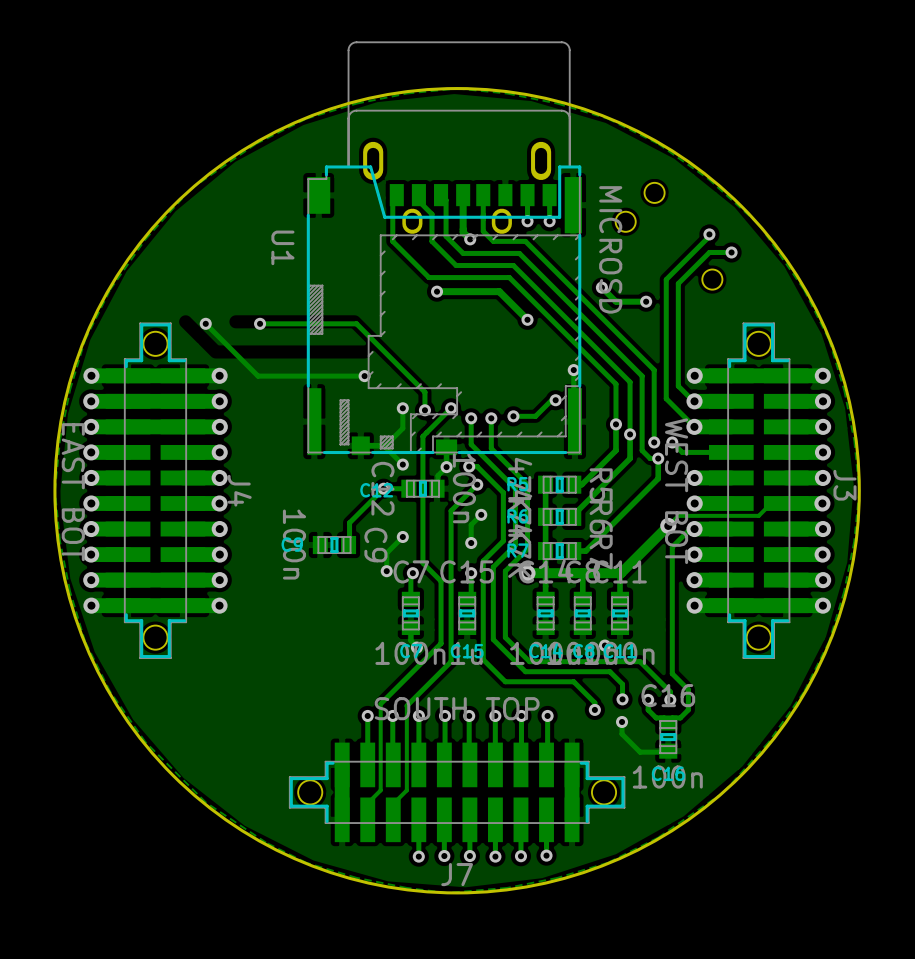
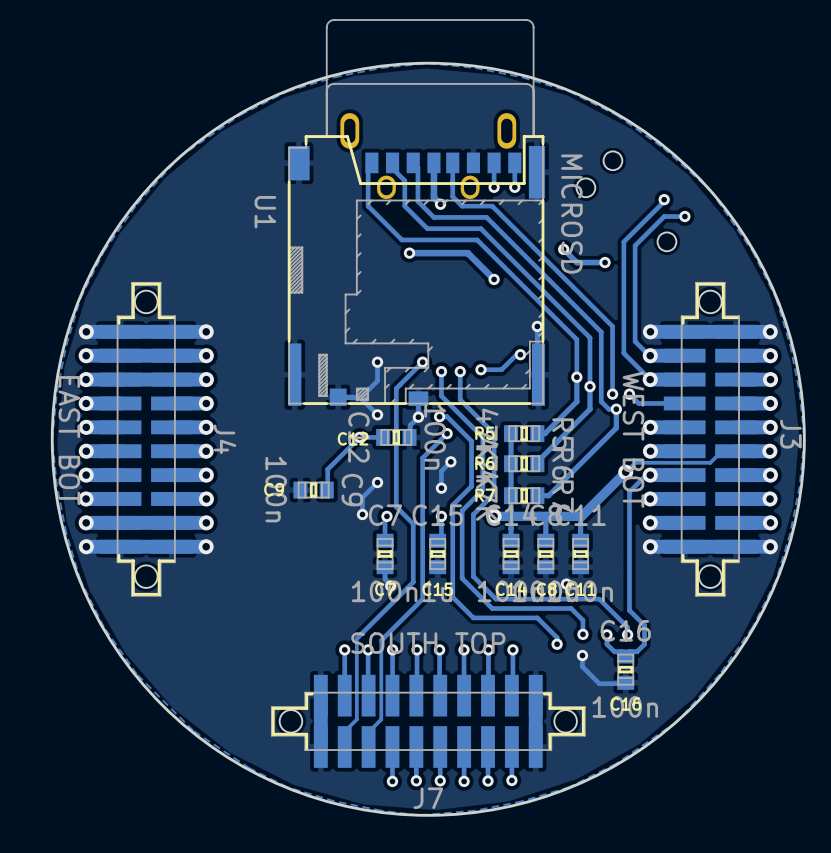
track: (205, 323) (258, 376) (364, 376) -> none
via: (205, 323) -> none
track: (260, 323) (356, 323) (424, 392) (424, 410) -> none
via: (260, 323) -> none
via: (364, 376) -> none
via: (424, 410) -> none

